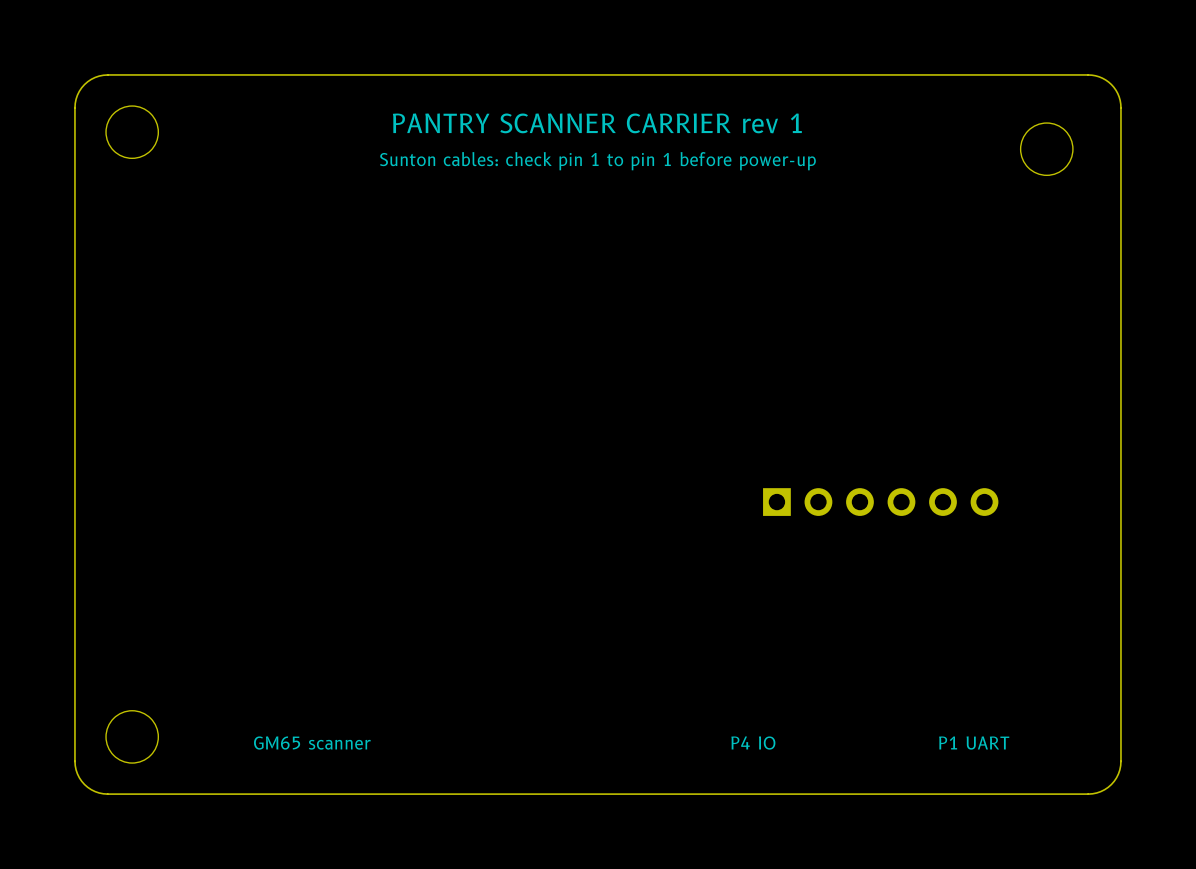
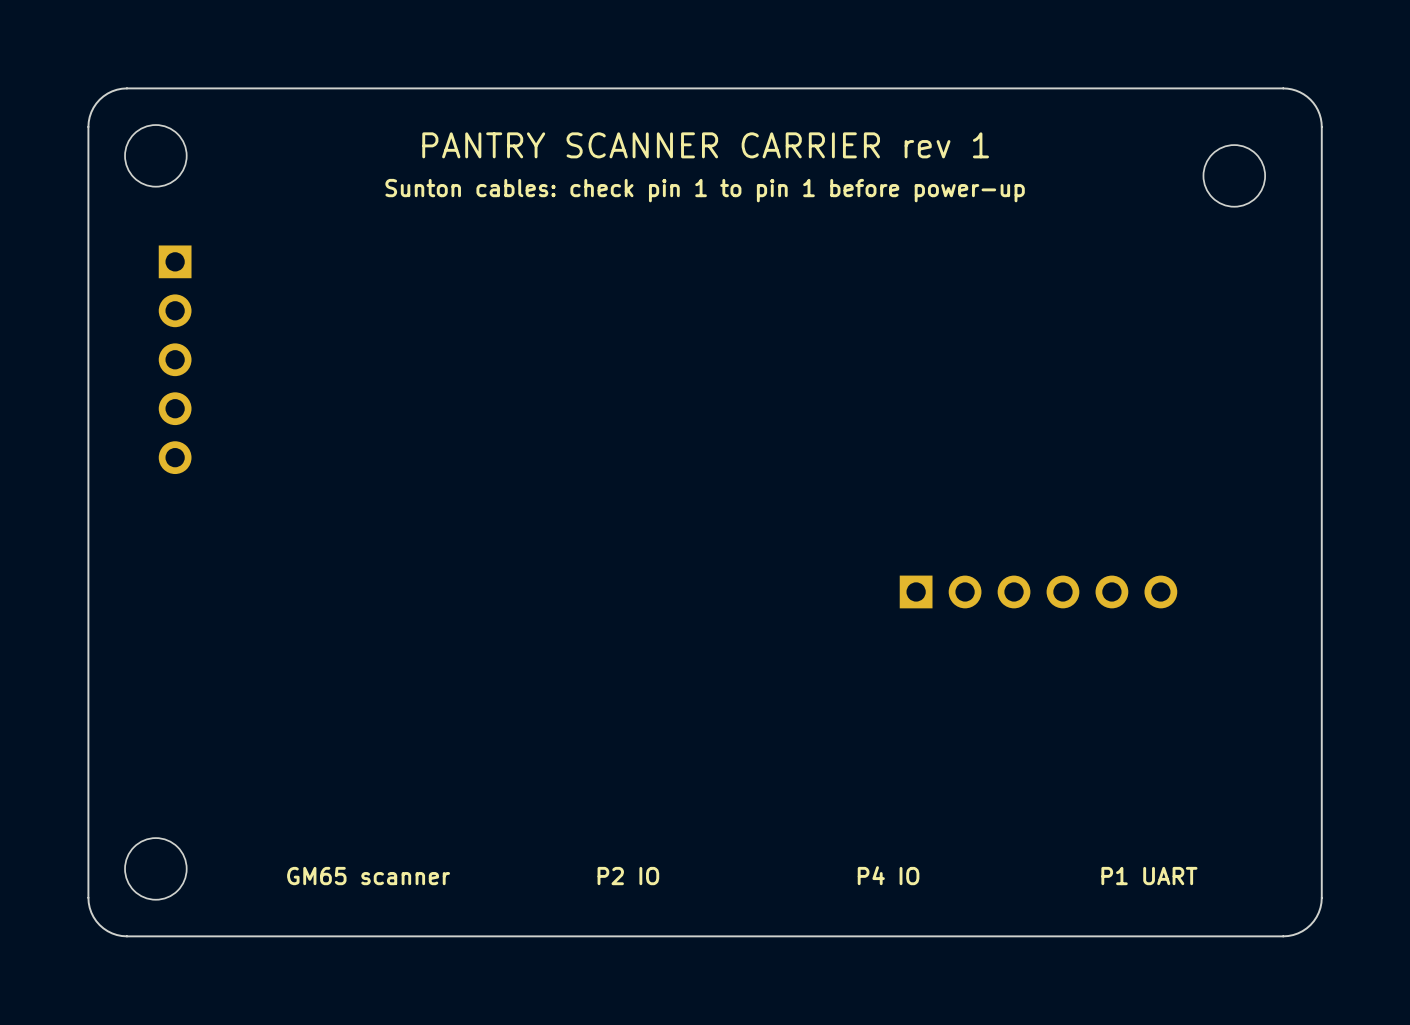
part: none -> (175, 359)
text: none -> P2 IO (628, 876)

